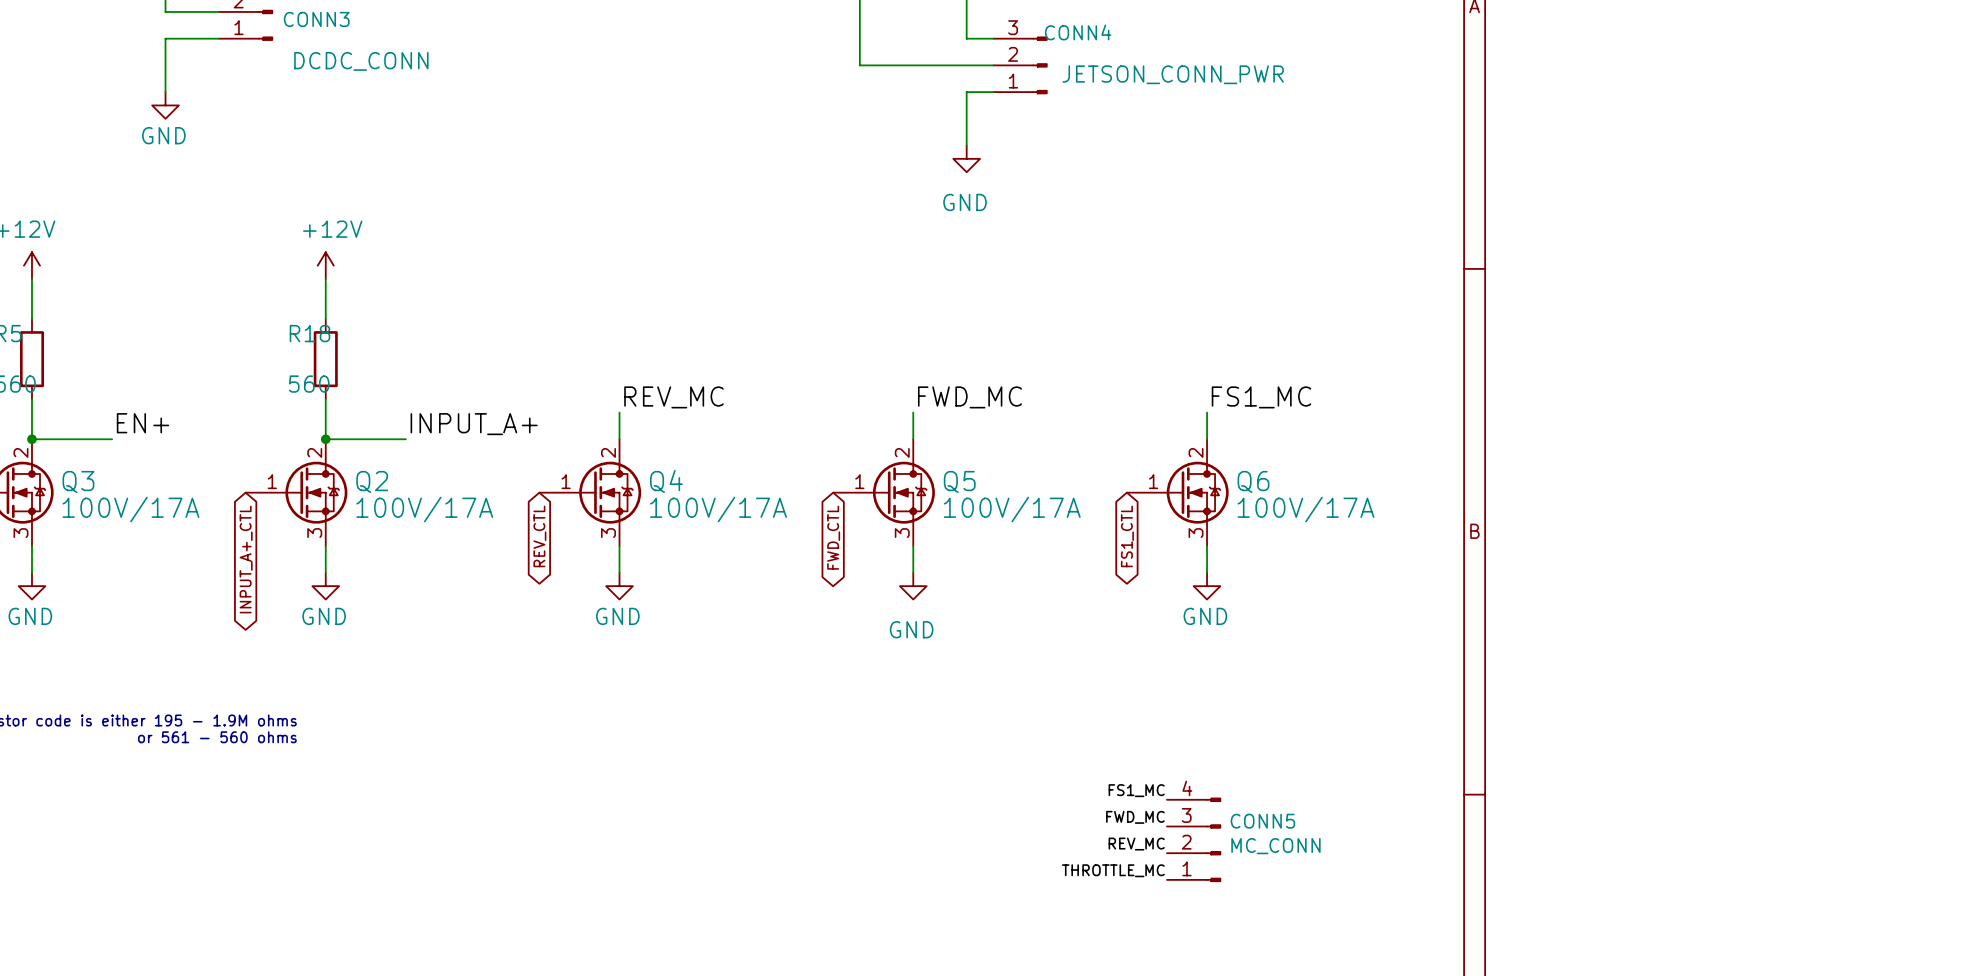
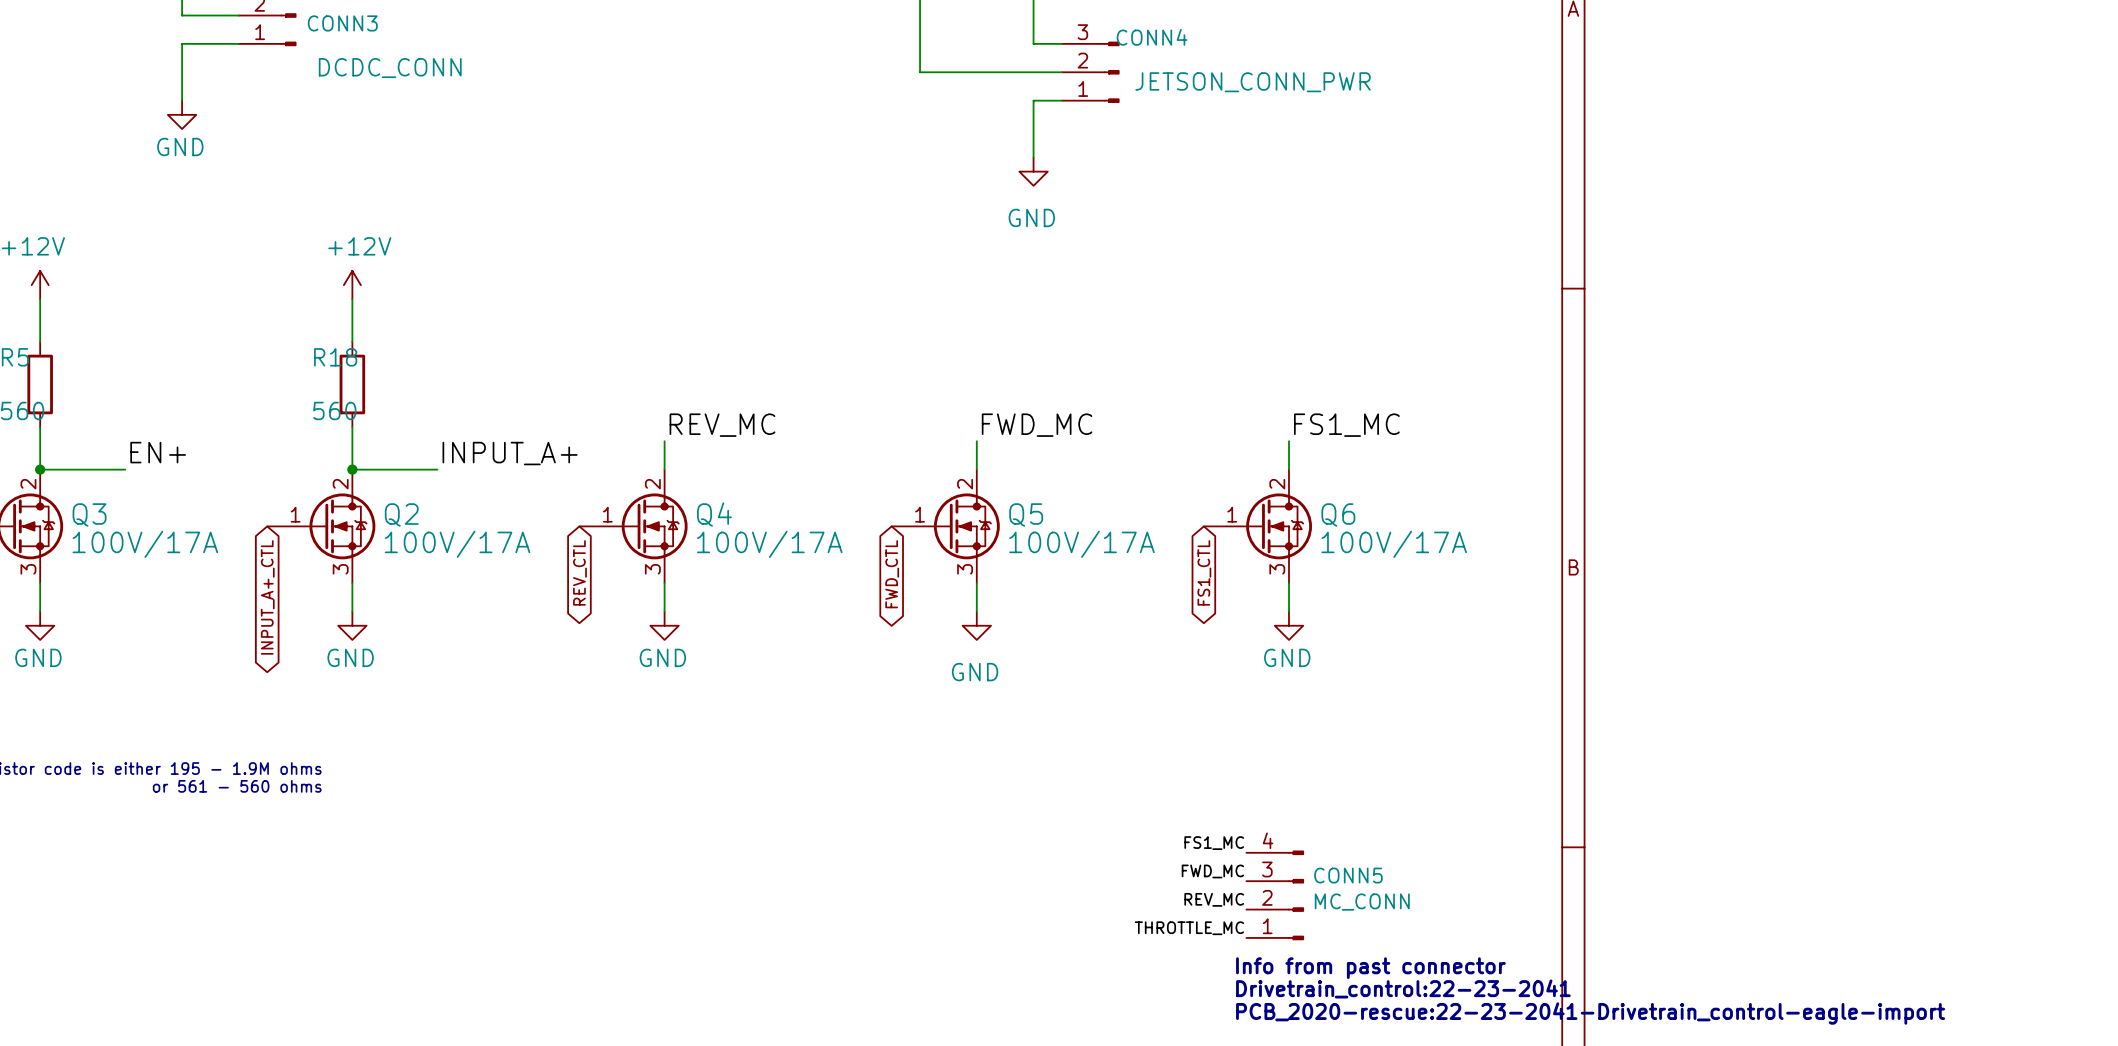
text: none -> Info from past connector (1370, 968)
text: none -> Drivetrain_control:22-23-2041 (1403, 988)
text: none -> PCB_2020-rescue:22-23-2041-Drivetrain_control-eagle-import (1590, 1013)

